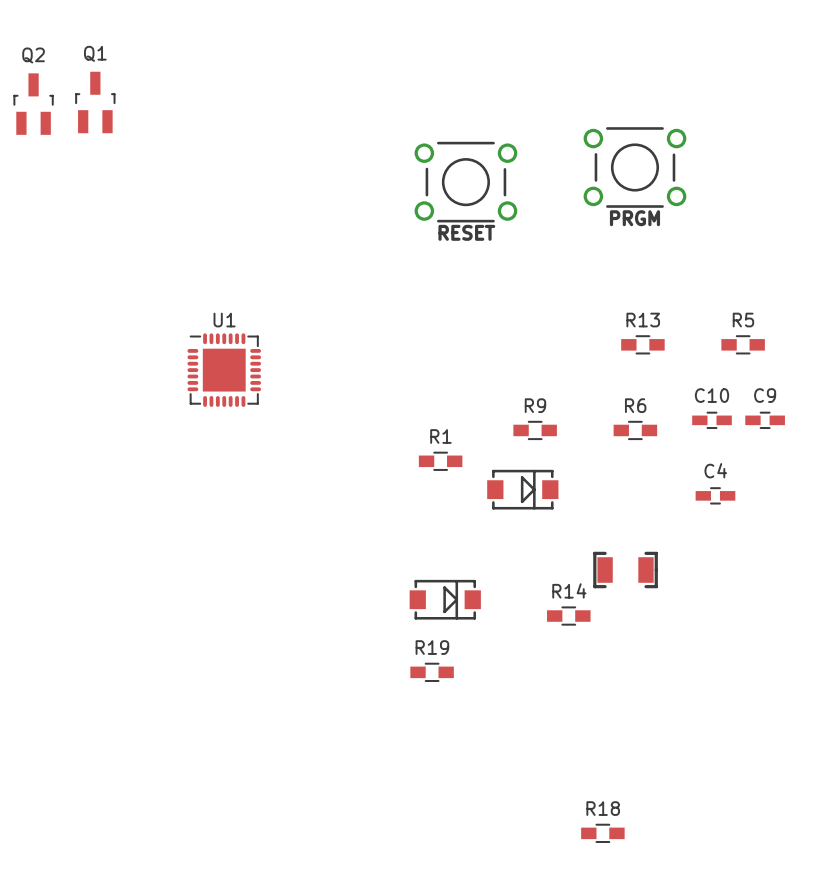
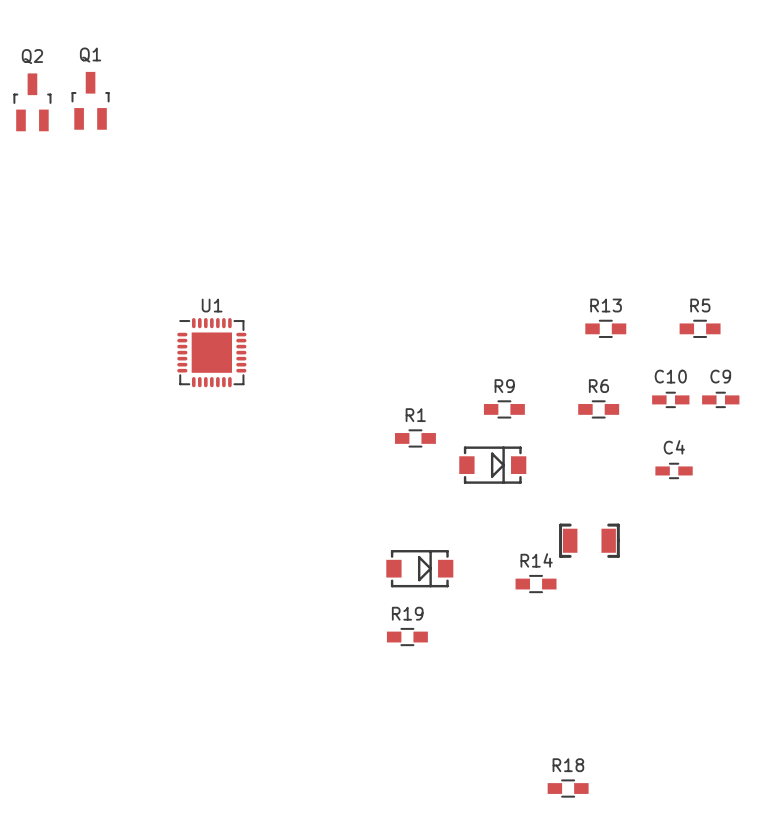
part: PRGM (634, 167) -> none
part: RESET (465, 182) -> none

